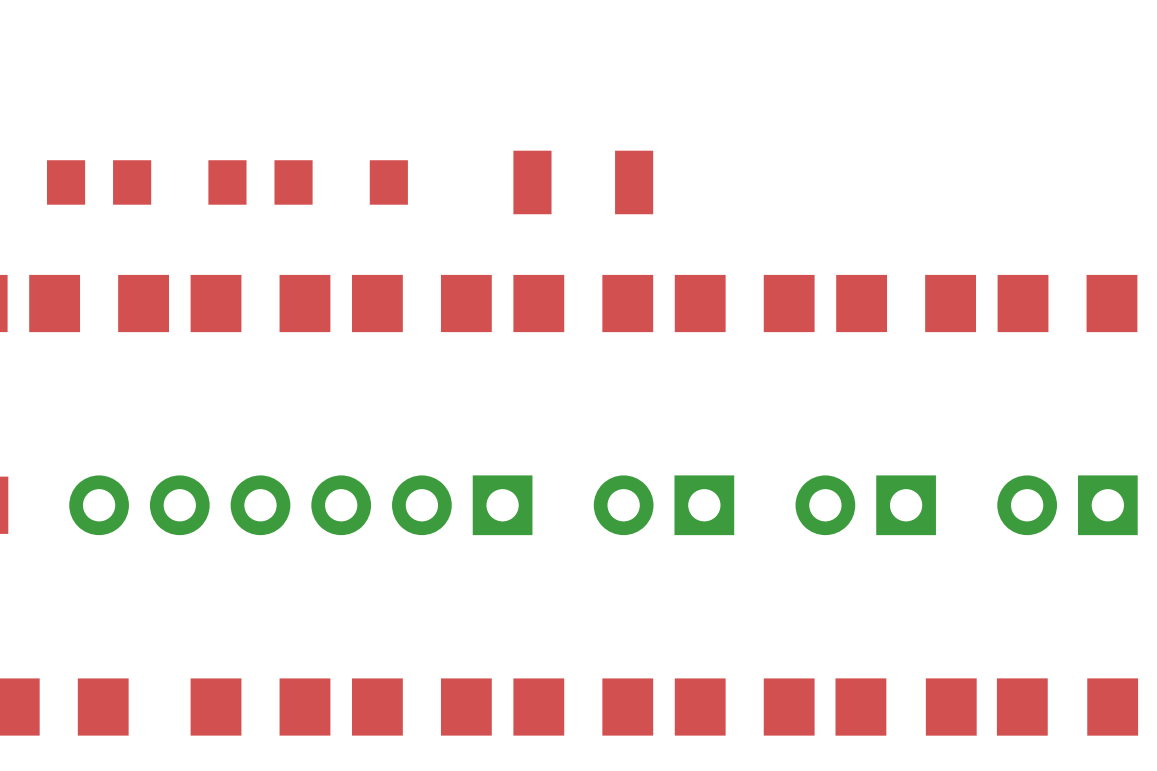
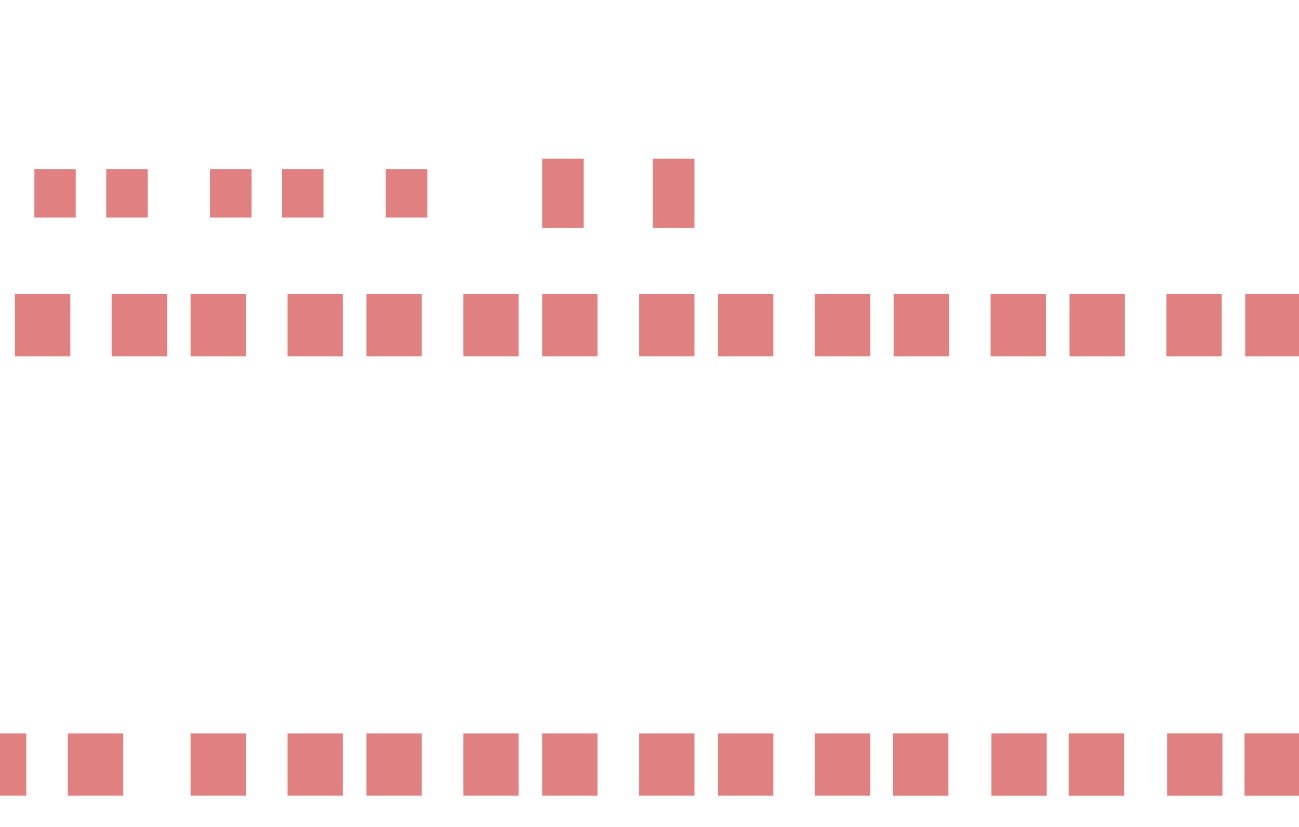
part: (300, 505) -> none
part: (663, 505) -> none
part: (865, 505) -> none
part: (1067, 505) -> none

